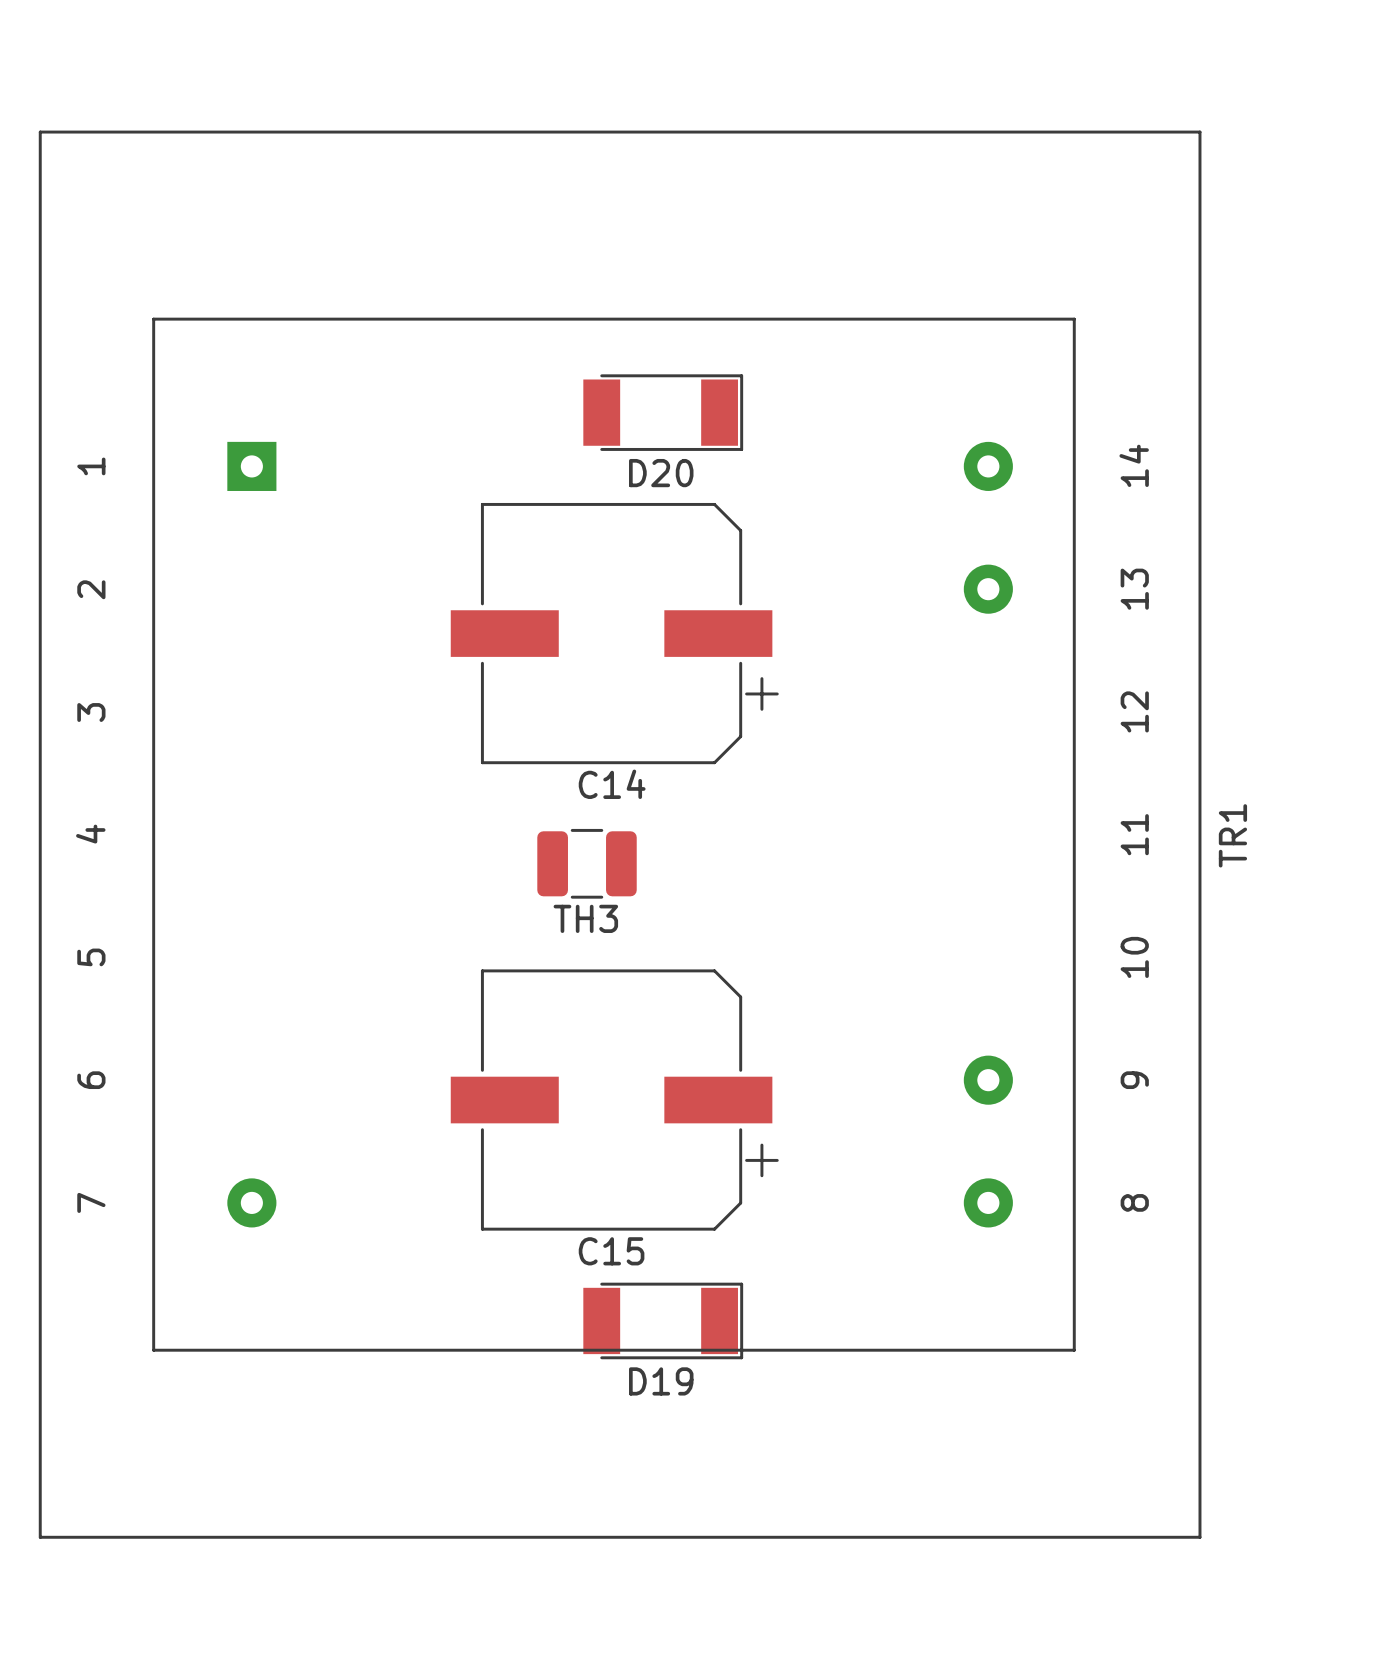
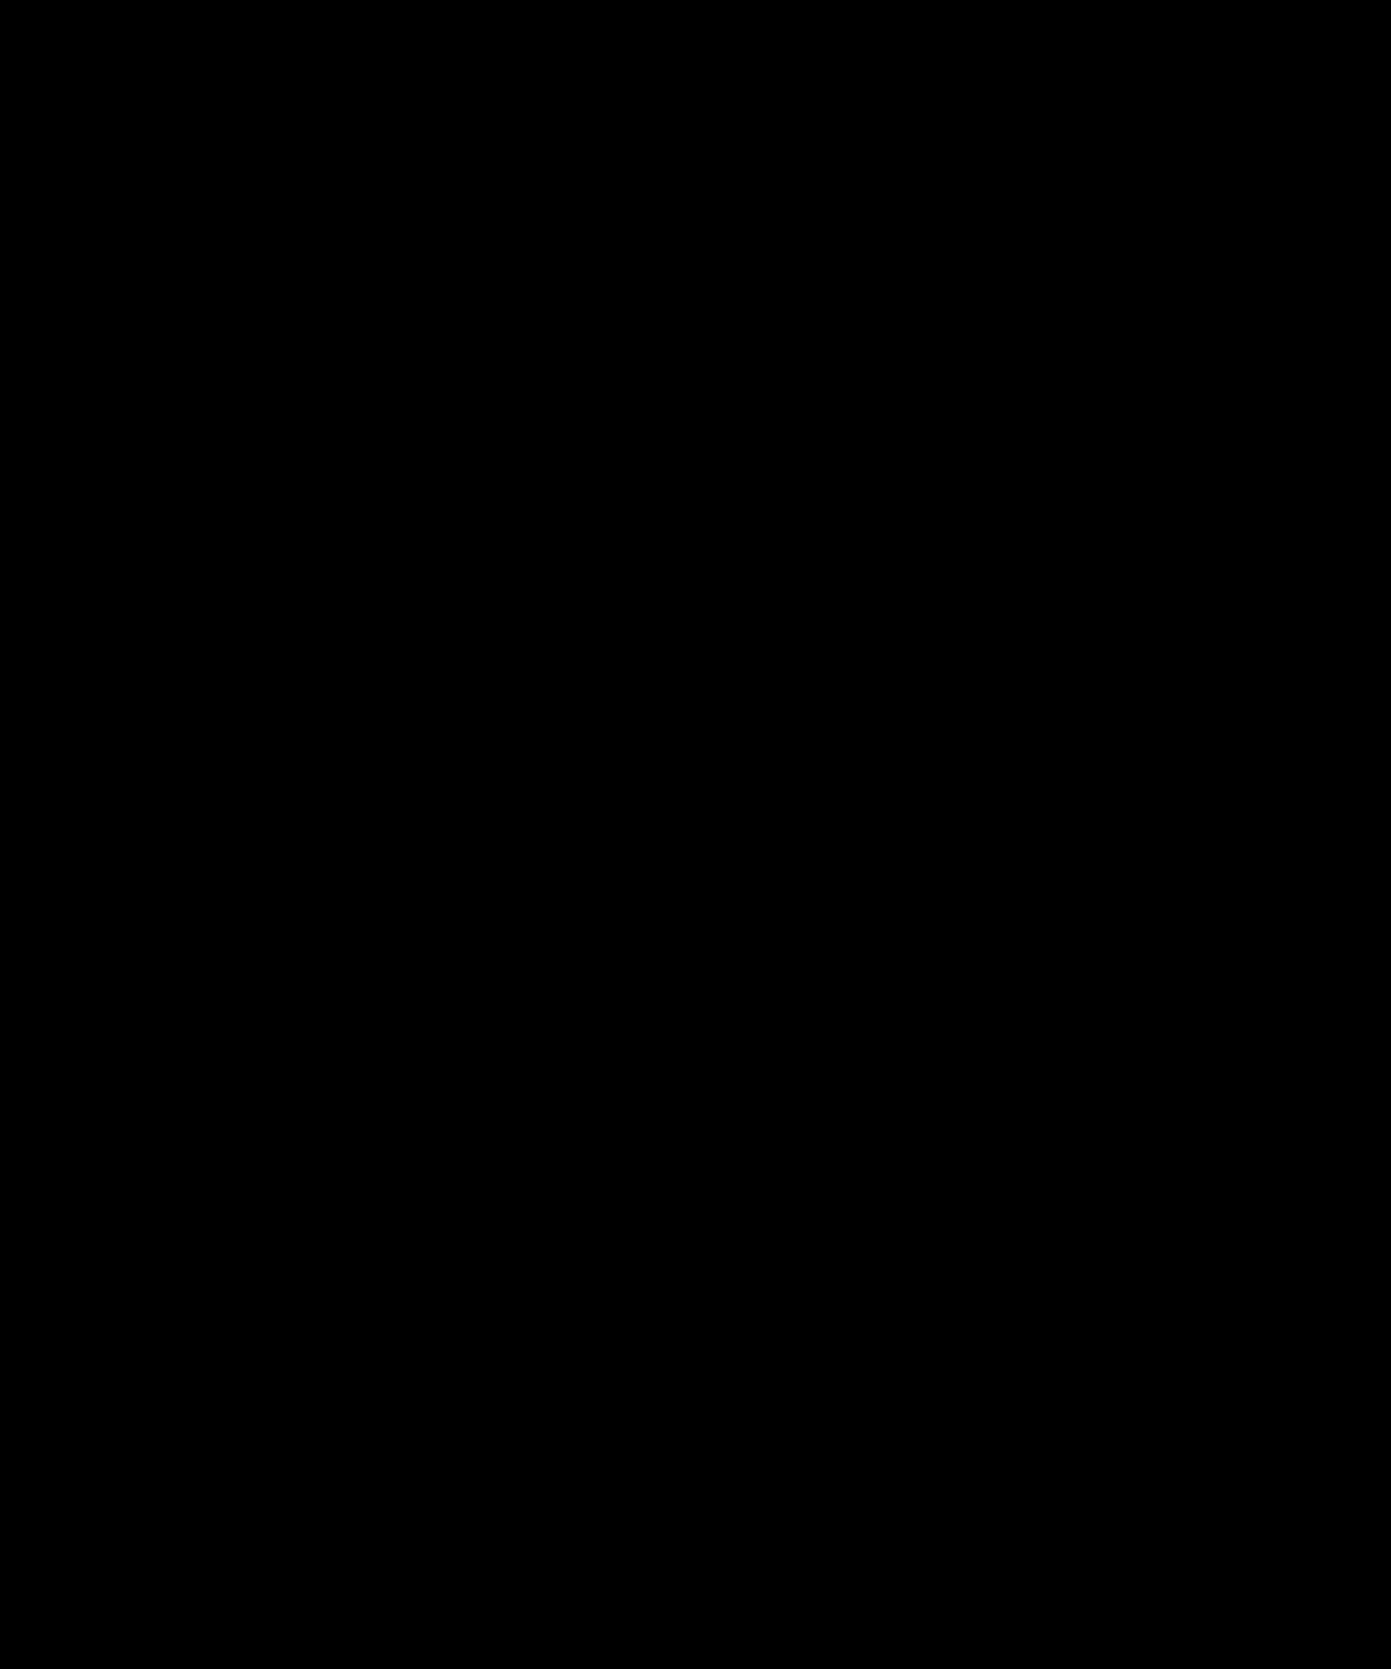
D20: (663, 412) -> none
C14: (614, 633) -> none
TR1: (620, 834) -> none
TH3: (587, 863) -> none
C15: (614, 1100) -> none
D19: (663, 1320) -> none

